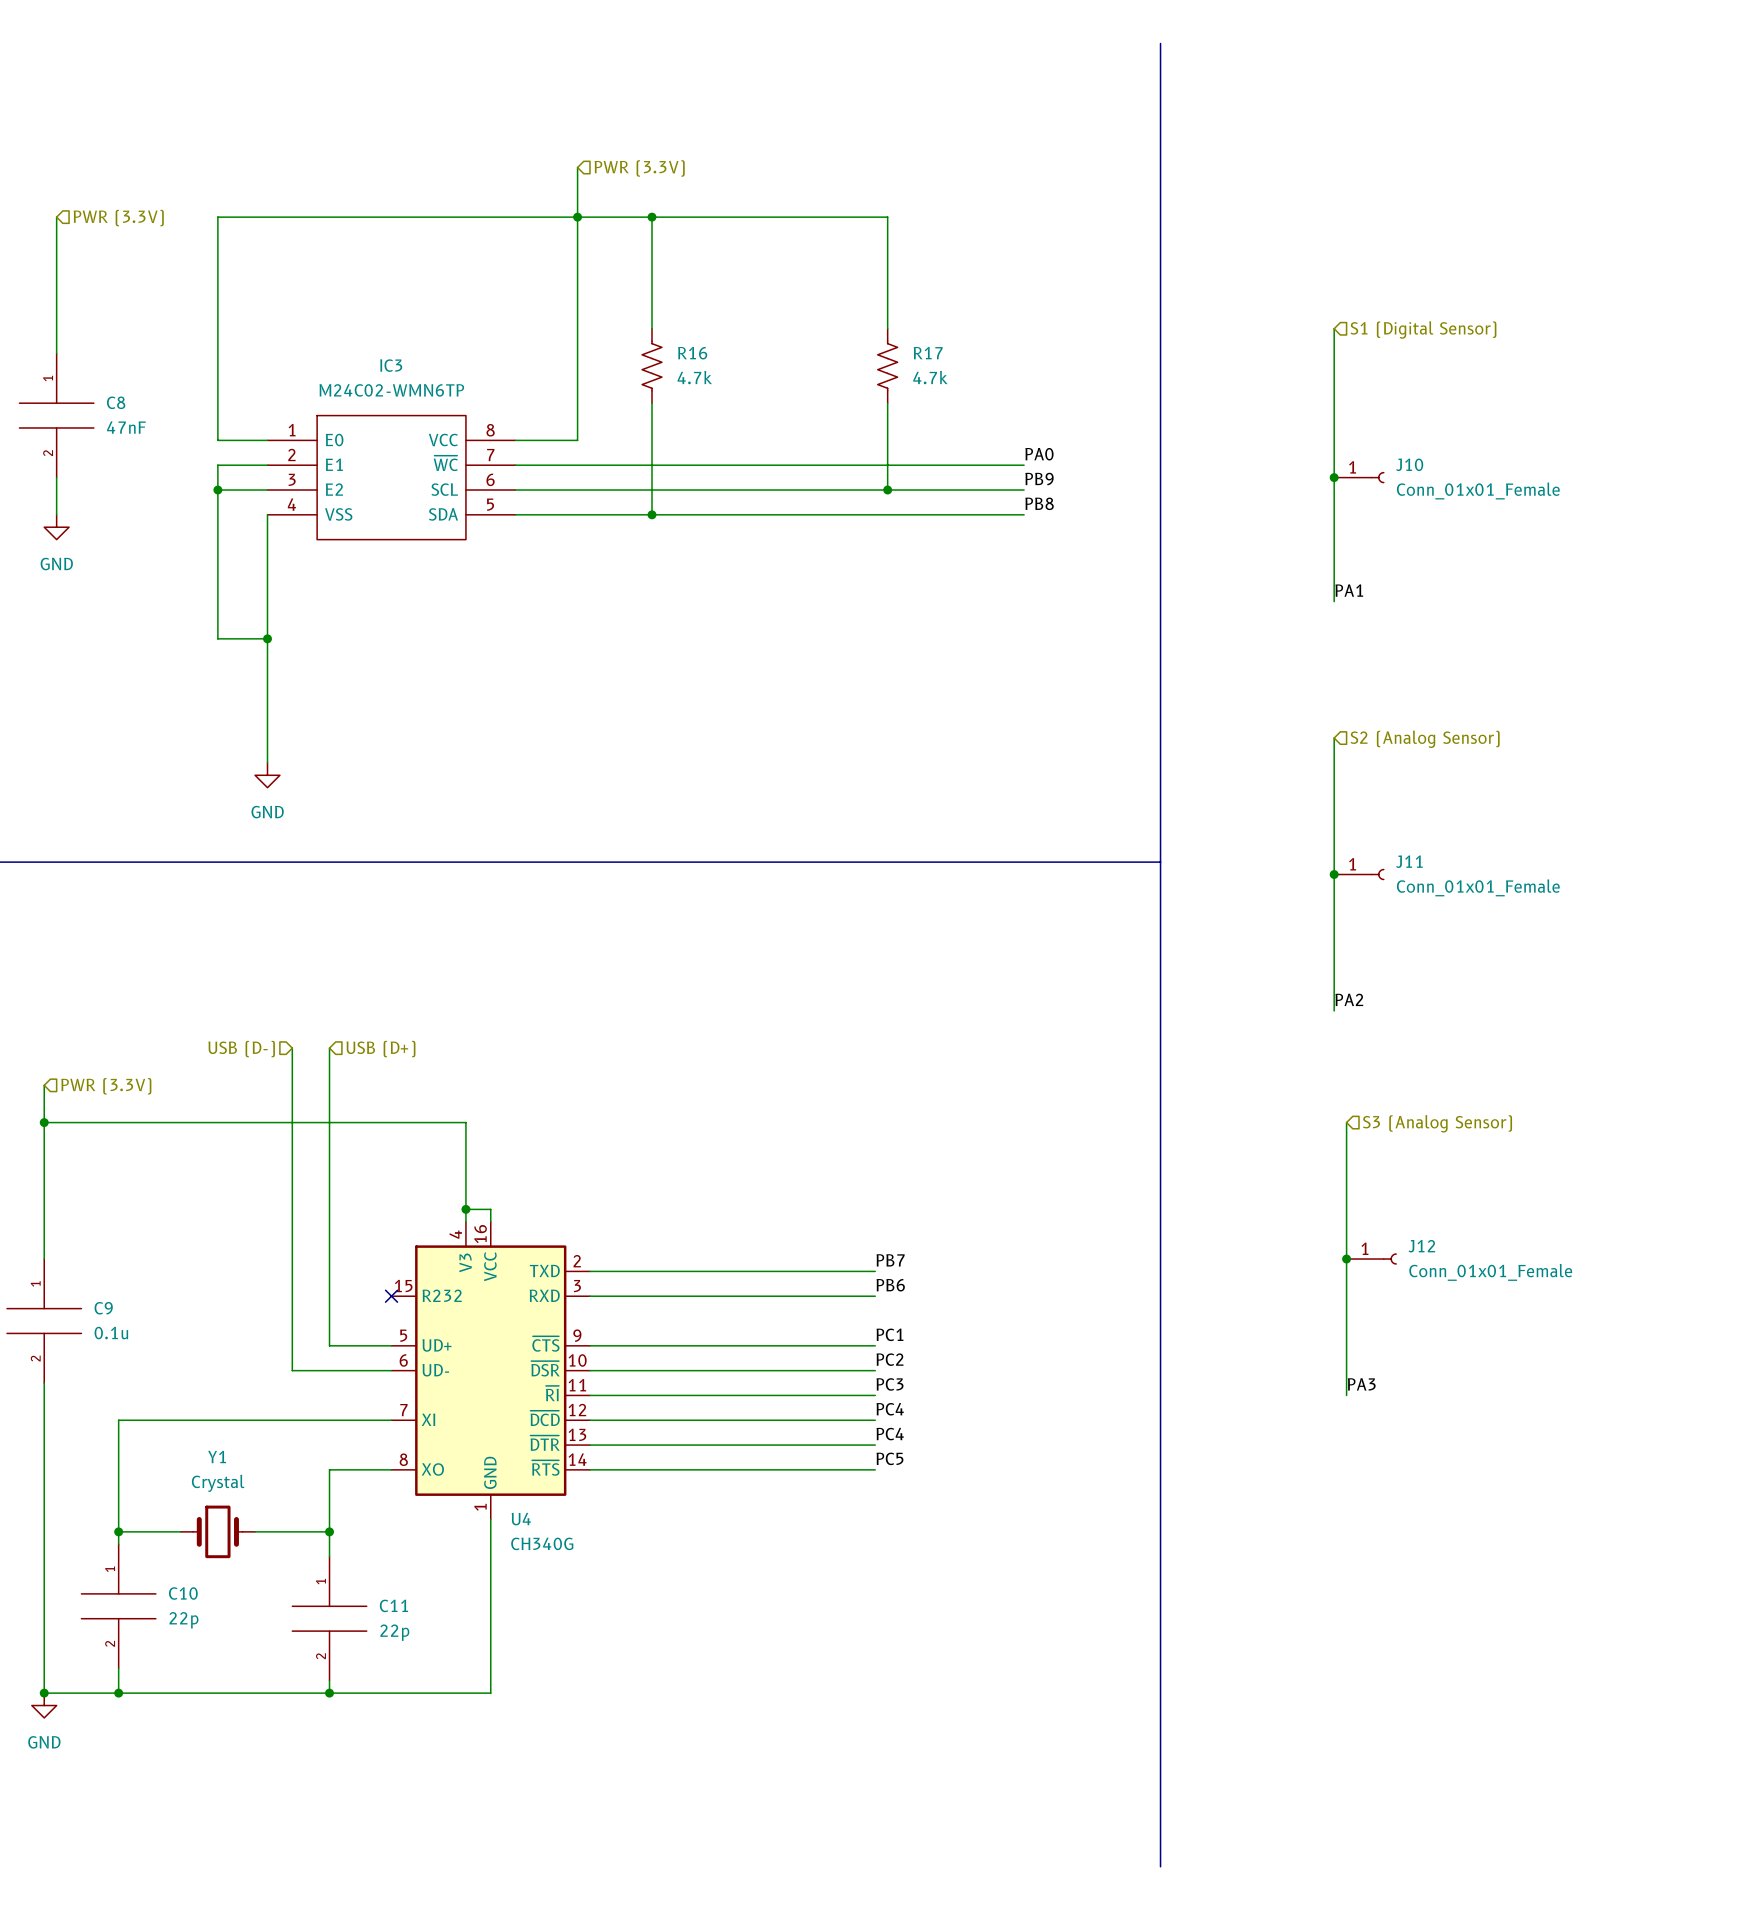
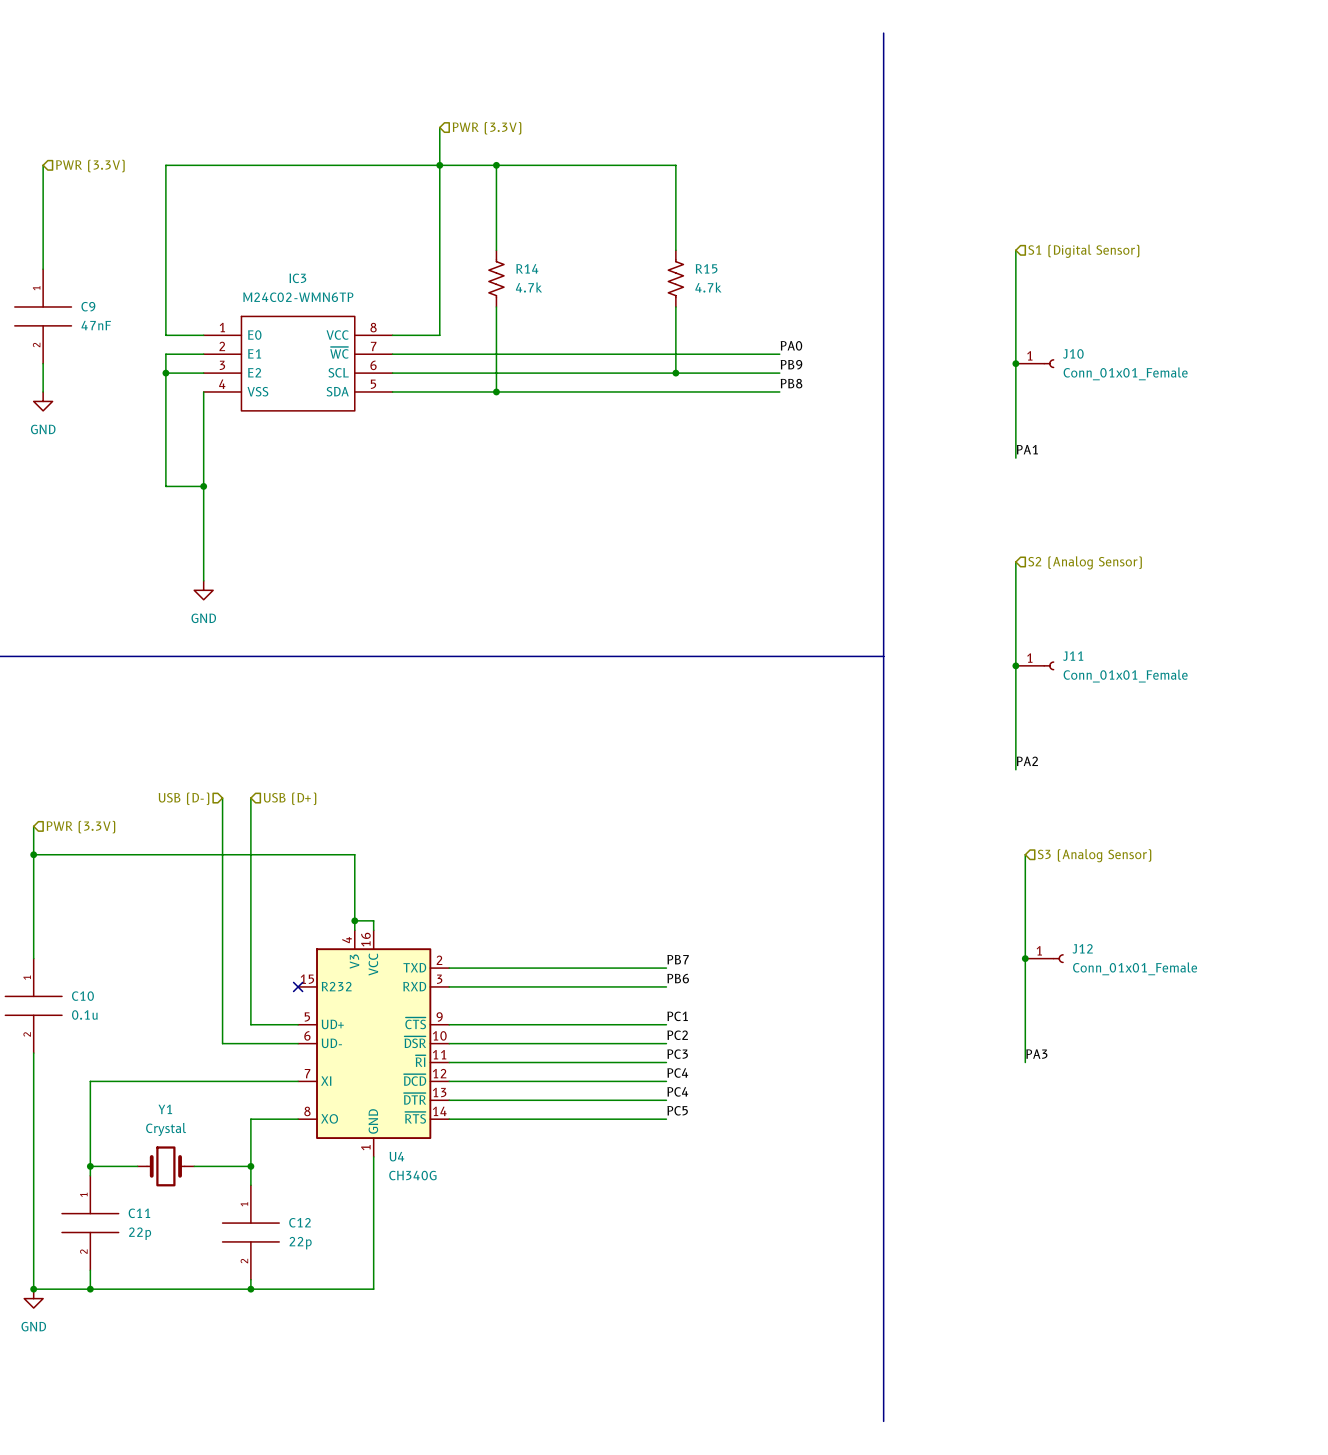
R16 name: R16 (692, 353) -> R14 (527, 268)
R17 name: R17 (928, 353) -> R15 (706, 268)
C8 name: C8 (116, 402) -> C9 (88, 306)
C9 name: C9 (103, 1308) -> C10 (82, 996)
C10 name: C10 (183, 1593) -> C11 (139, 1213)
C11 name: C11 (393, 1605) -> C12 (299, 1222)

